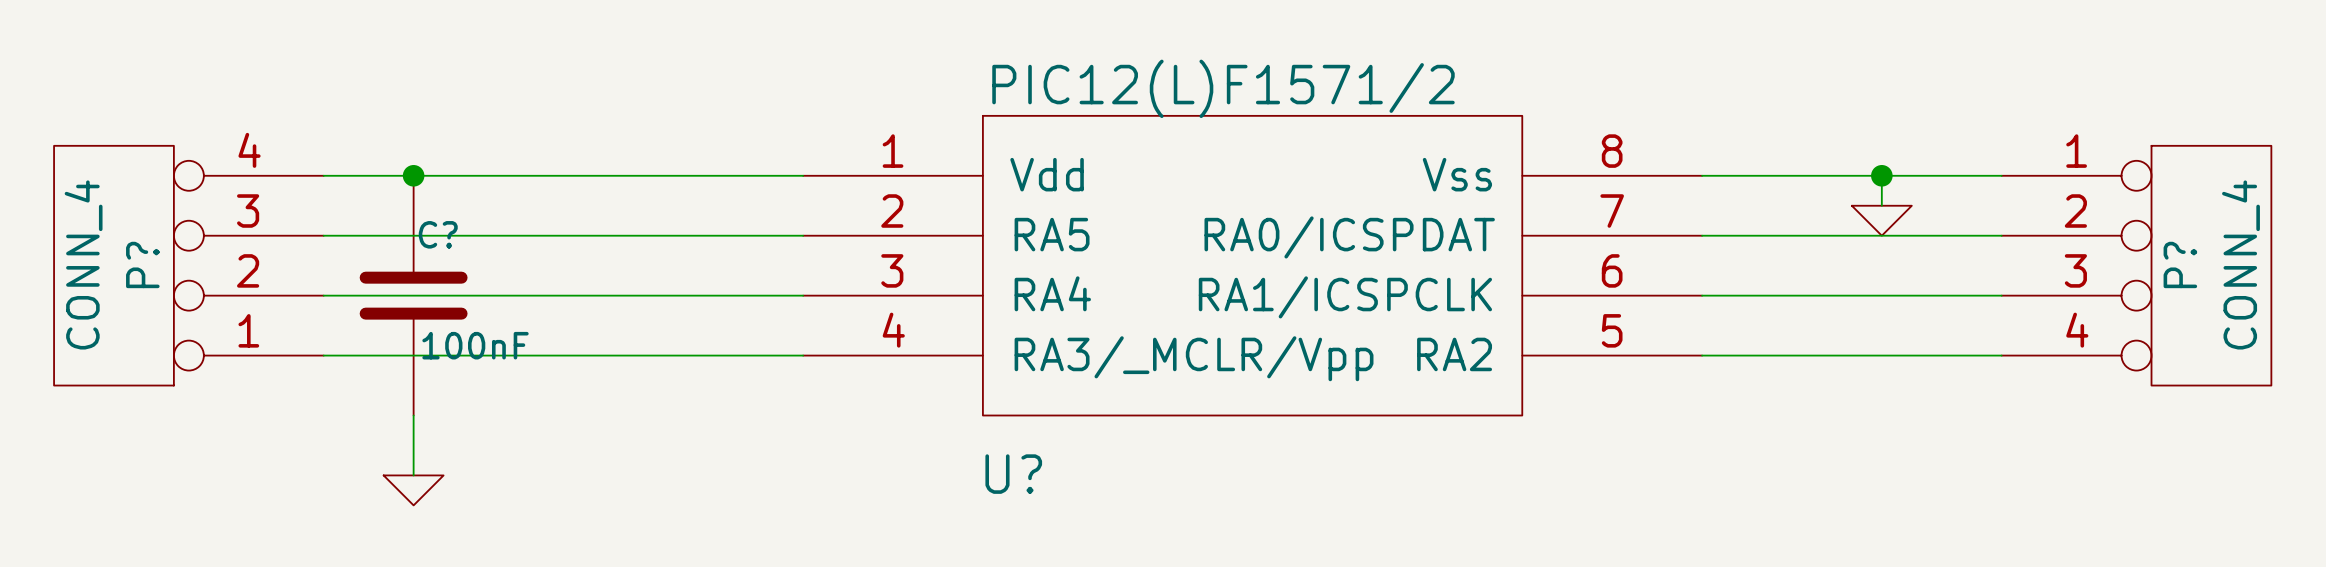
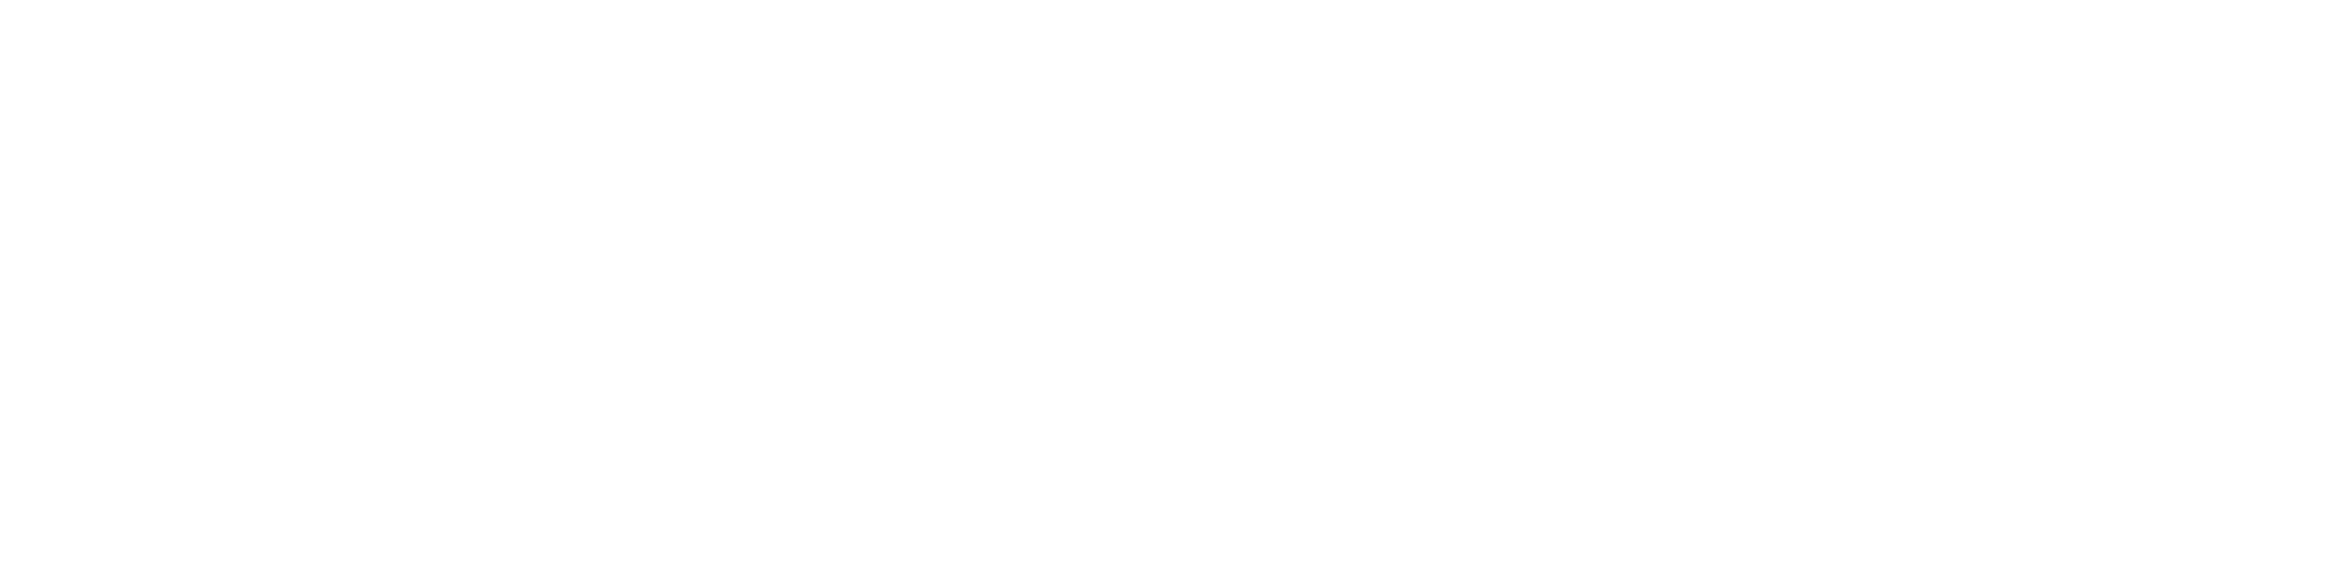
wire: (323, 175) (803, 175) -> none
junction: (413, 175) -> none
wire: (1702, 175) (2001, 175) -> none
wire: (1881, 175) (1881, 205) -> none
junction: (1881, 175) -> none
power symbol: (1881, 220) -> none
wire: (323, 235) (803, 235) -> none
wire: (1702, 235) (2001, 235) -> none
P?: CONN_4 (188, 265) -> none
U?: PIC12(L)F1571/2 (1252, 265) -> none
P?: CONN_4 (2136, 265) -> none
wire: (323, 295) (803, 295) -> none
C?: 100nF (413, 295) -> none
wire: (1702, 295) (2001, 295) -> none
wire: (323, 355) (803, 355) -> none
wire: (1702, 355) (2001, 355) -> none
wire: (413, 415) (413, 475) -> none
power symbol: (413, 490) -> none

